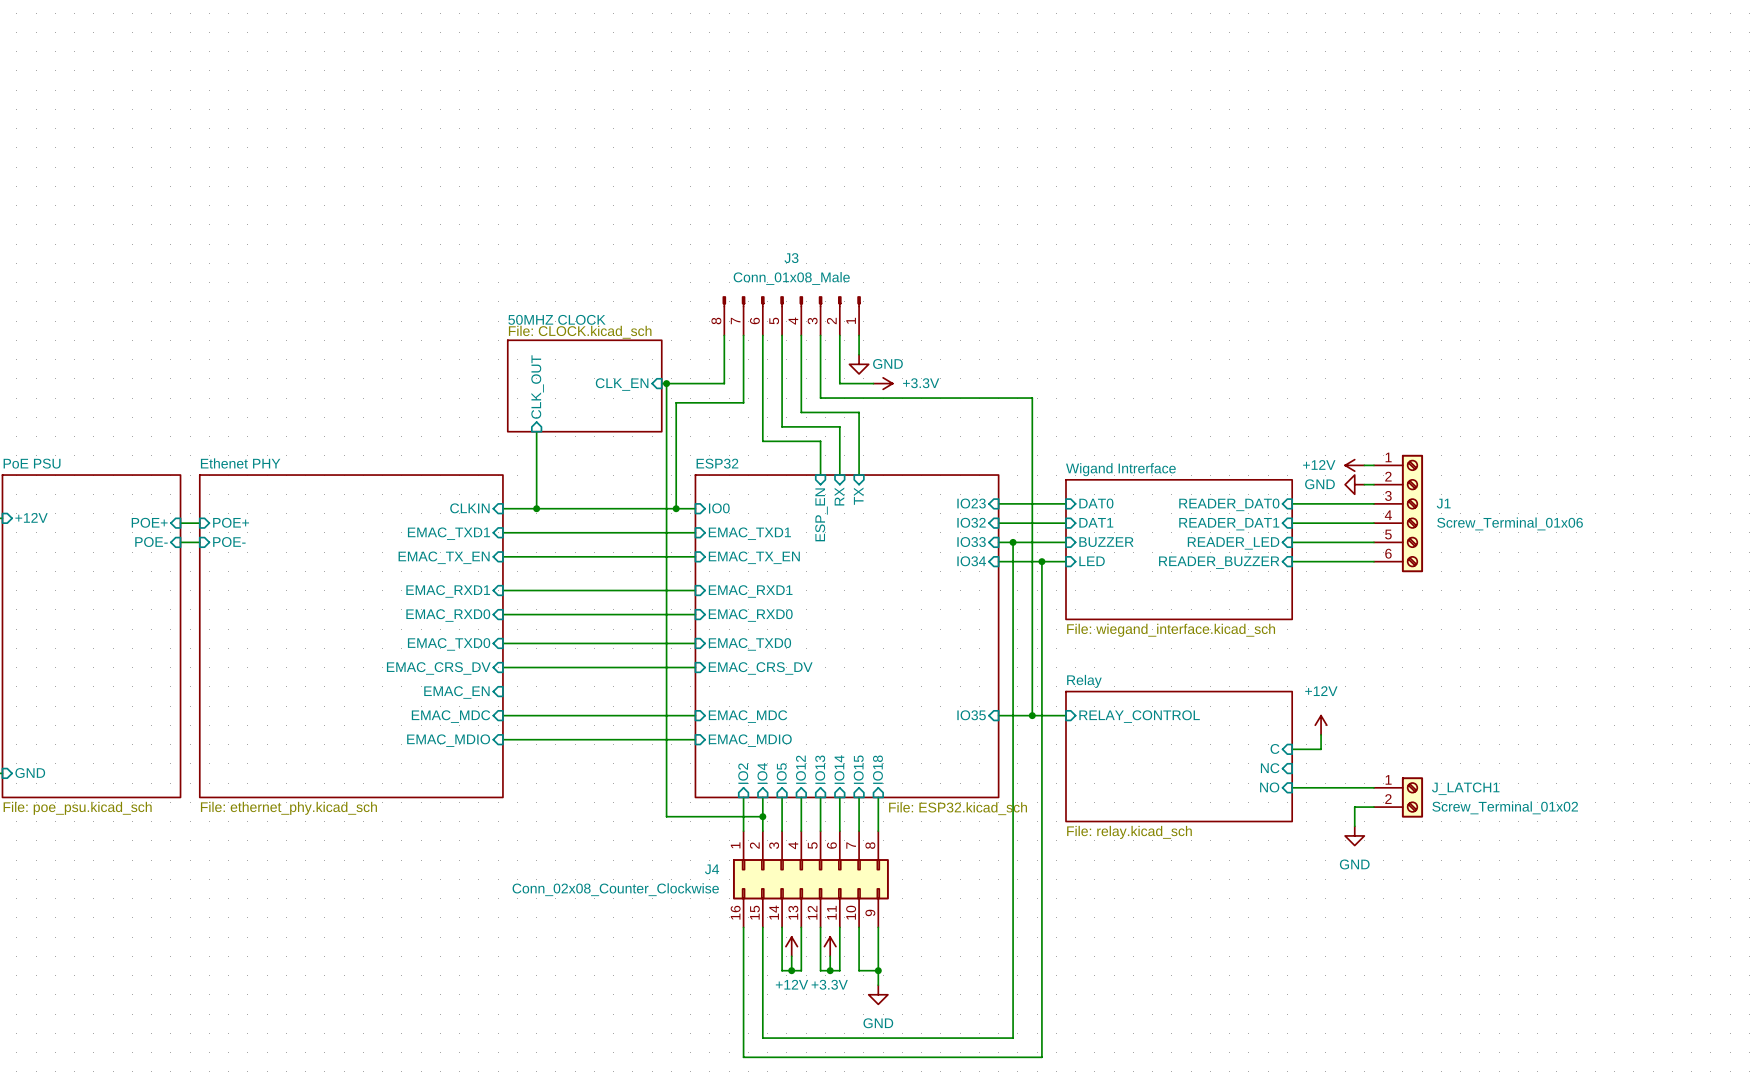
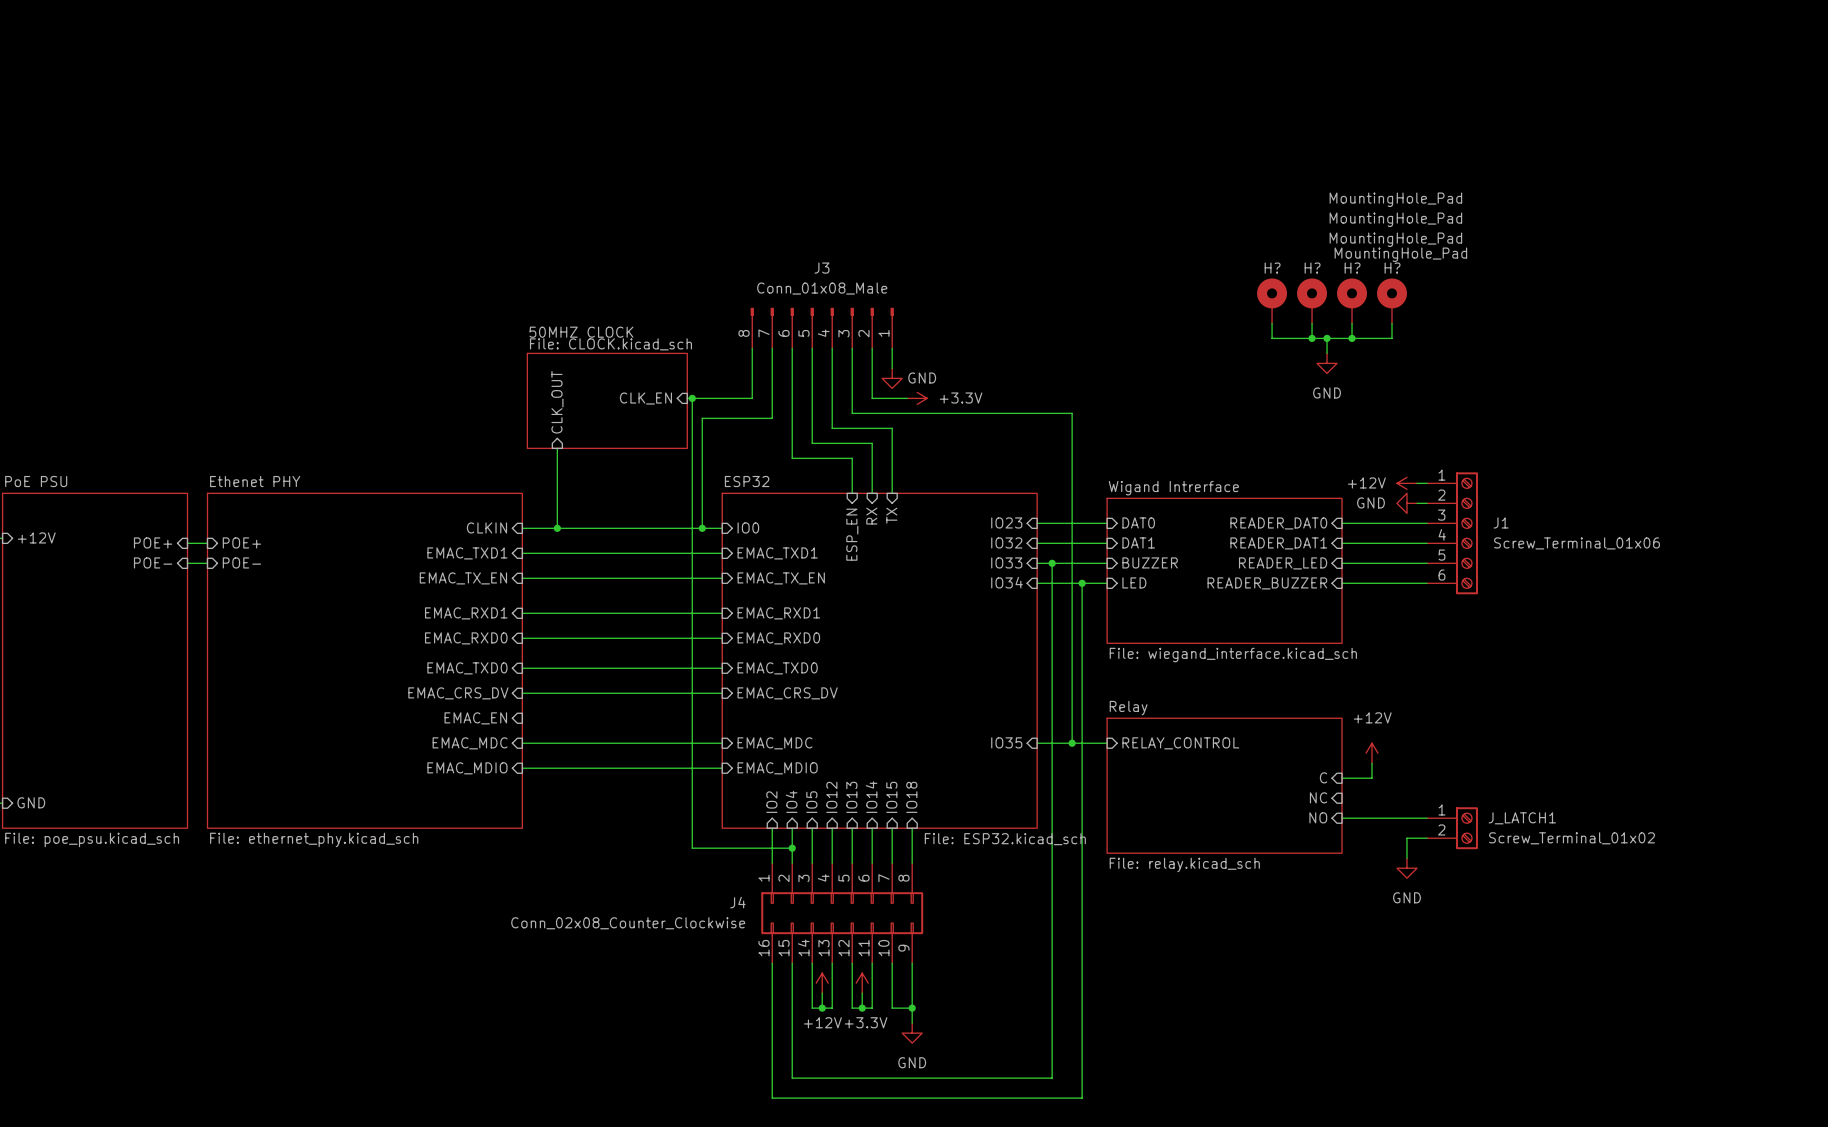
H?: none -> MountingHole_Pad (1272, 300)
H?: none -> MountingHole_Pad (1312, 300)
H?: none -> MountingHole_Pad (1352, 300)
H?: none -> MountingHole_Pad (1392, 300)
wire: none -> (1272, 323) (1272, 338) (1392, 338) (1392, 323)
wire: none -> (1312, 323) (1312, 338)
wire: none -> (1352, 323) (1352, 338)
junction: none -> (1312, 338)
wire: none -> (1327, 338) (1327, 353)
junction: none -> (1327, 338)
junction: none -> (1352, 338)
power symbol: none -> GND (1327, 363)

